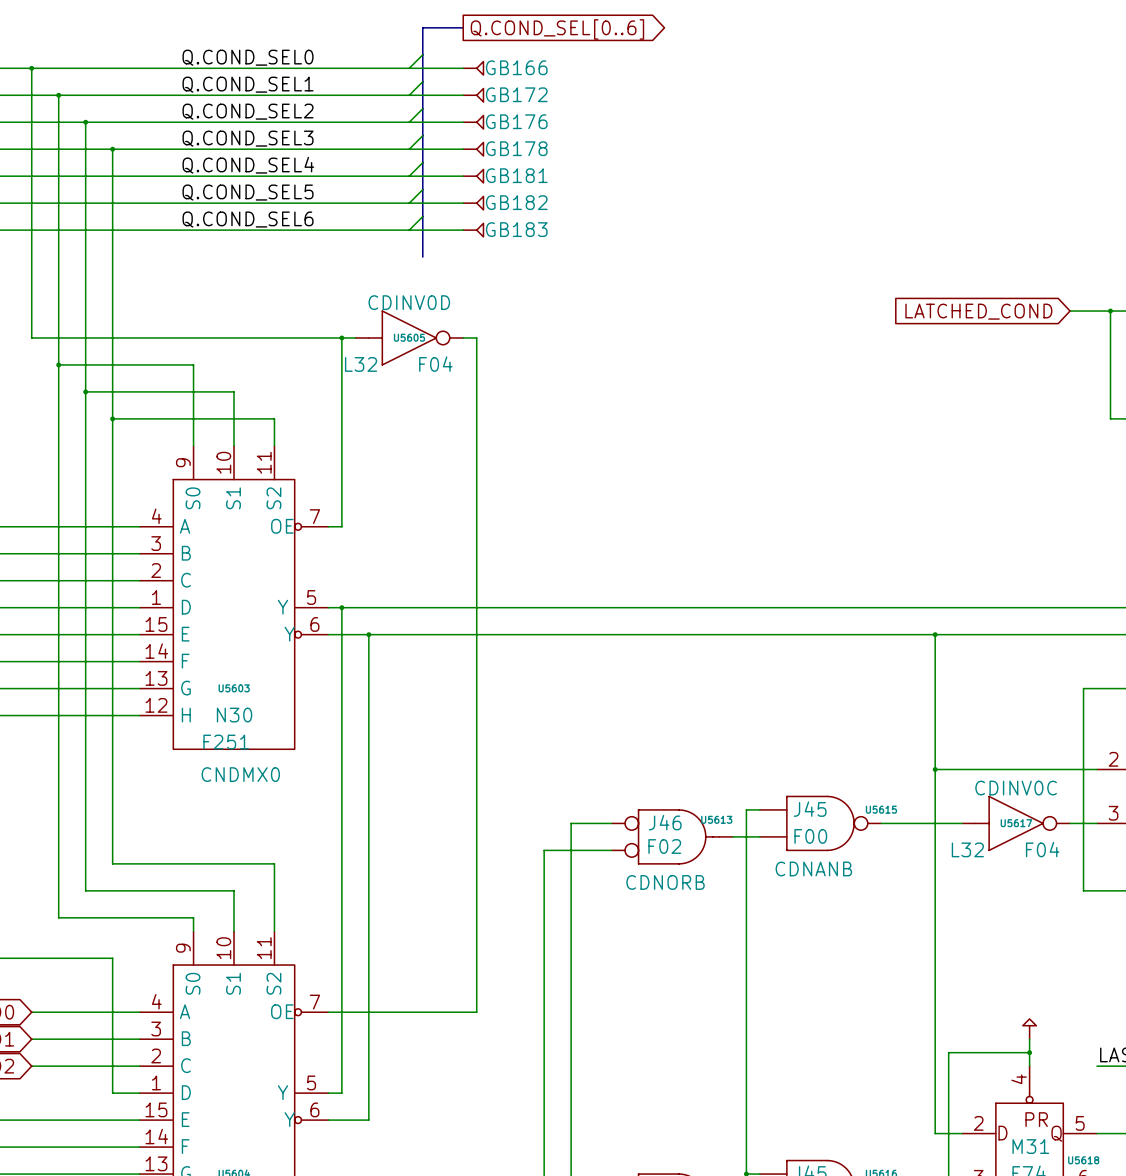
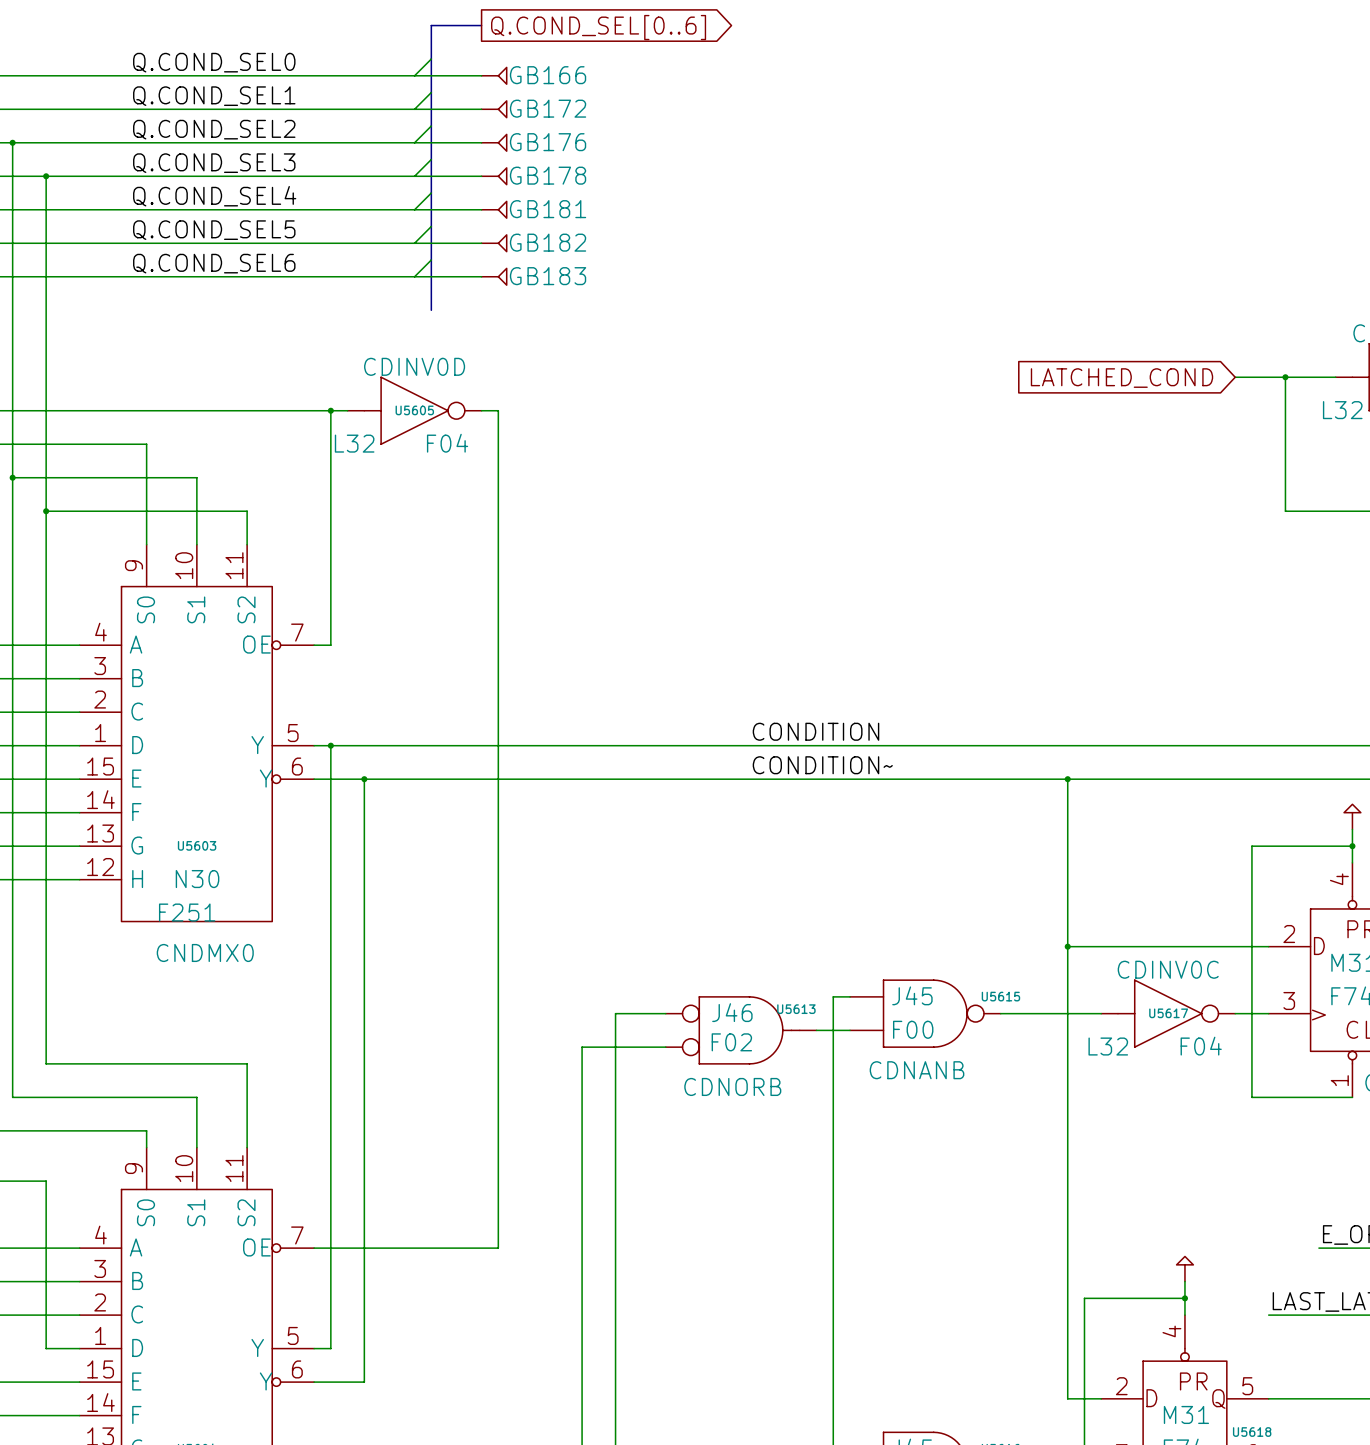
label: none -> CONDITION (815, 731)
label: none -> CONDITION~ (822, 765)

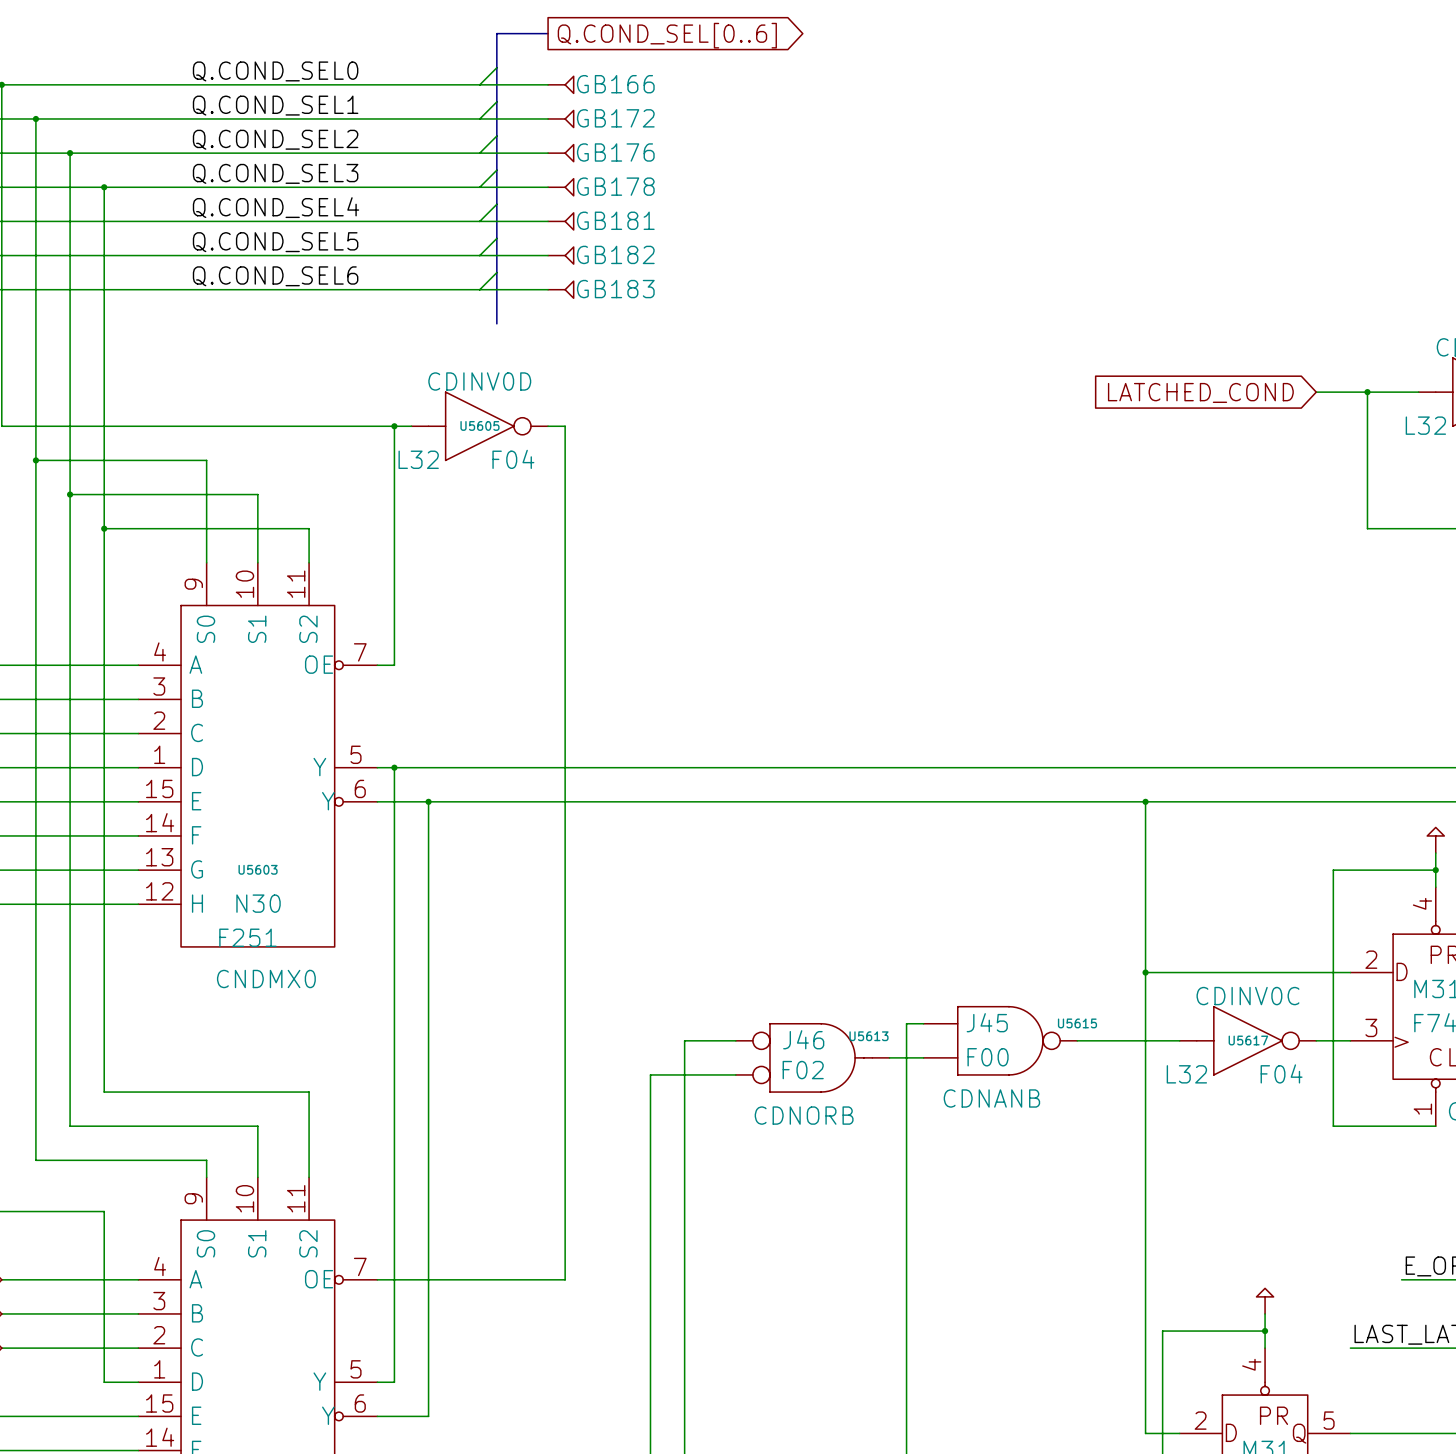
label: CONDITION (815, 731) -> none
label: CONDITION~ (822, 765) -> none

